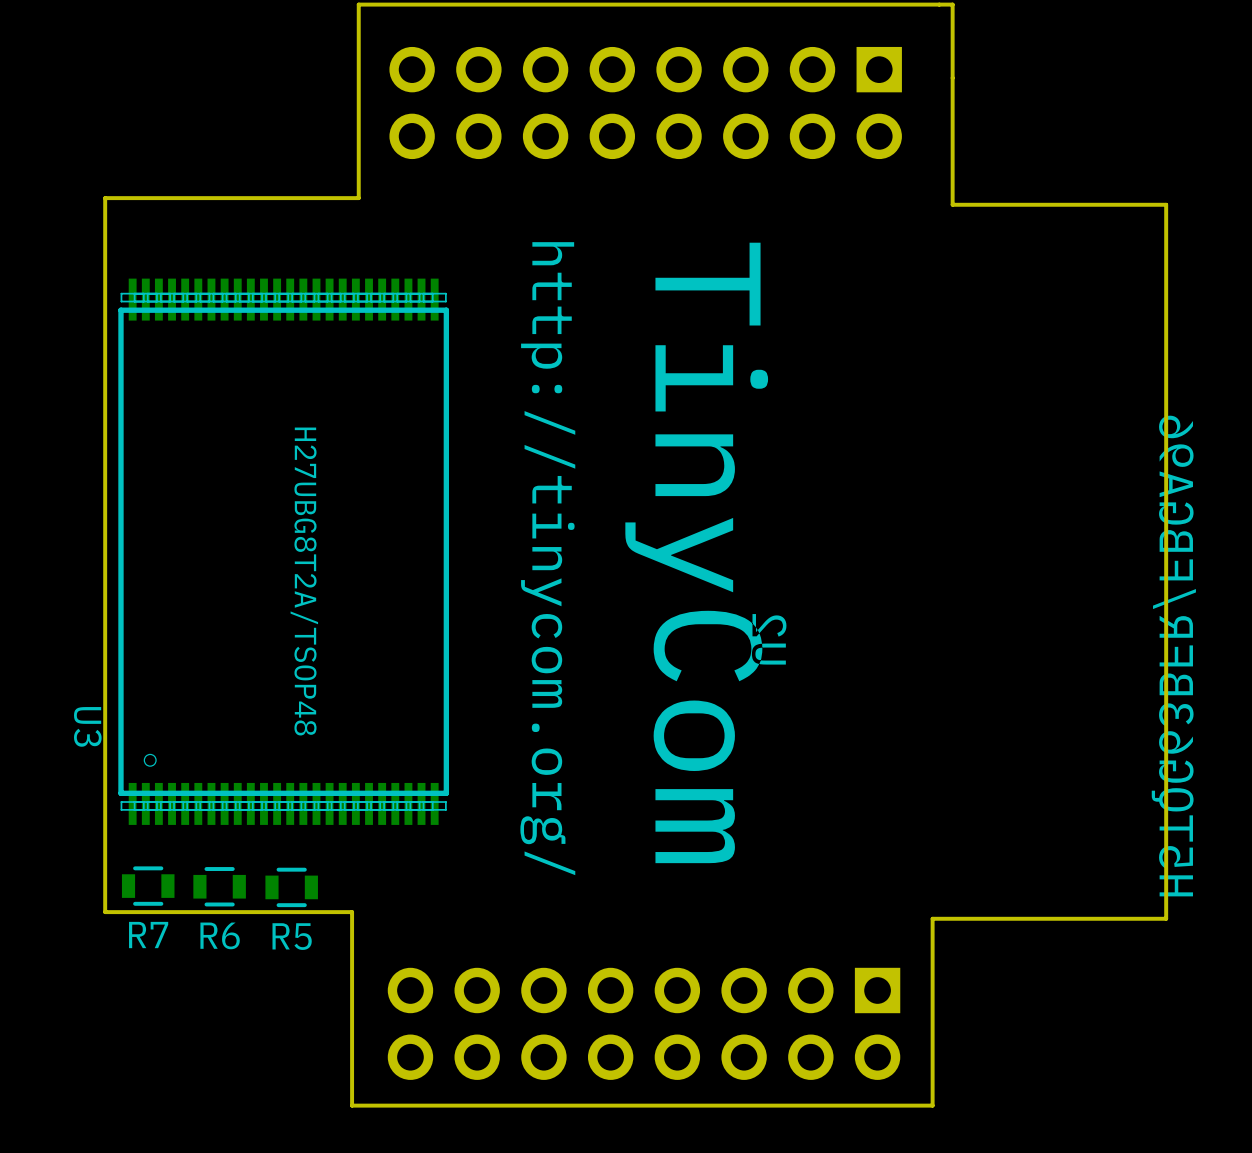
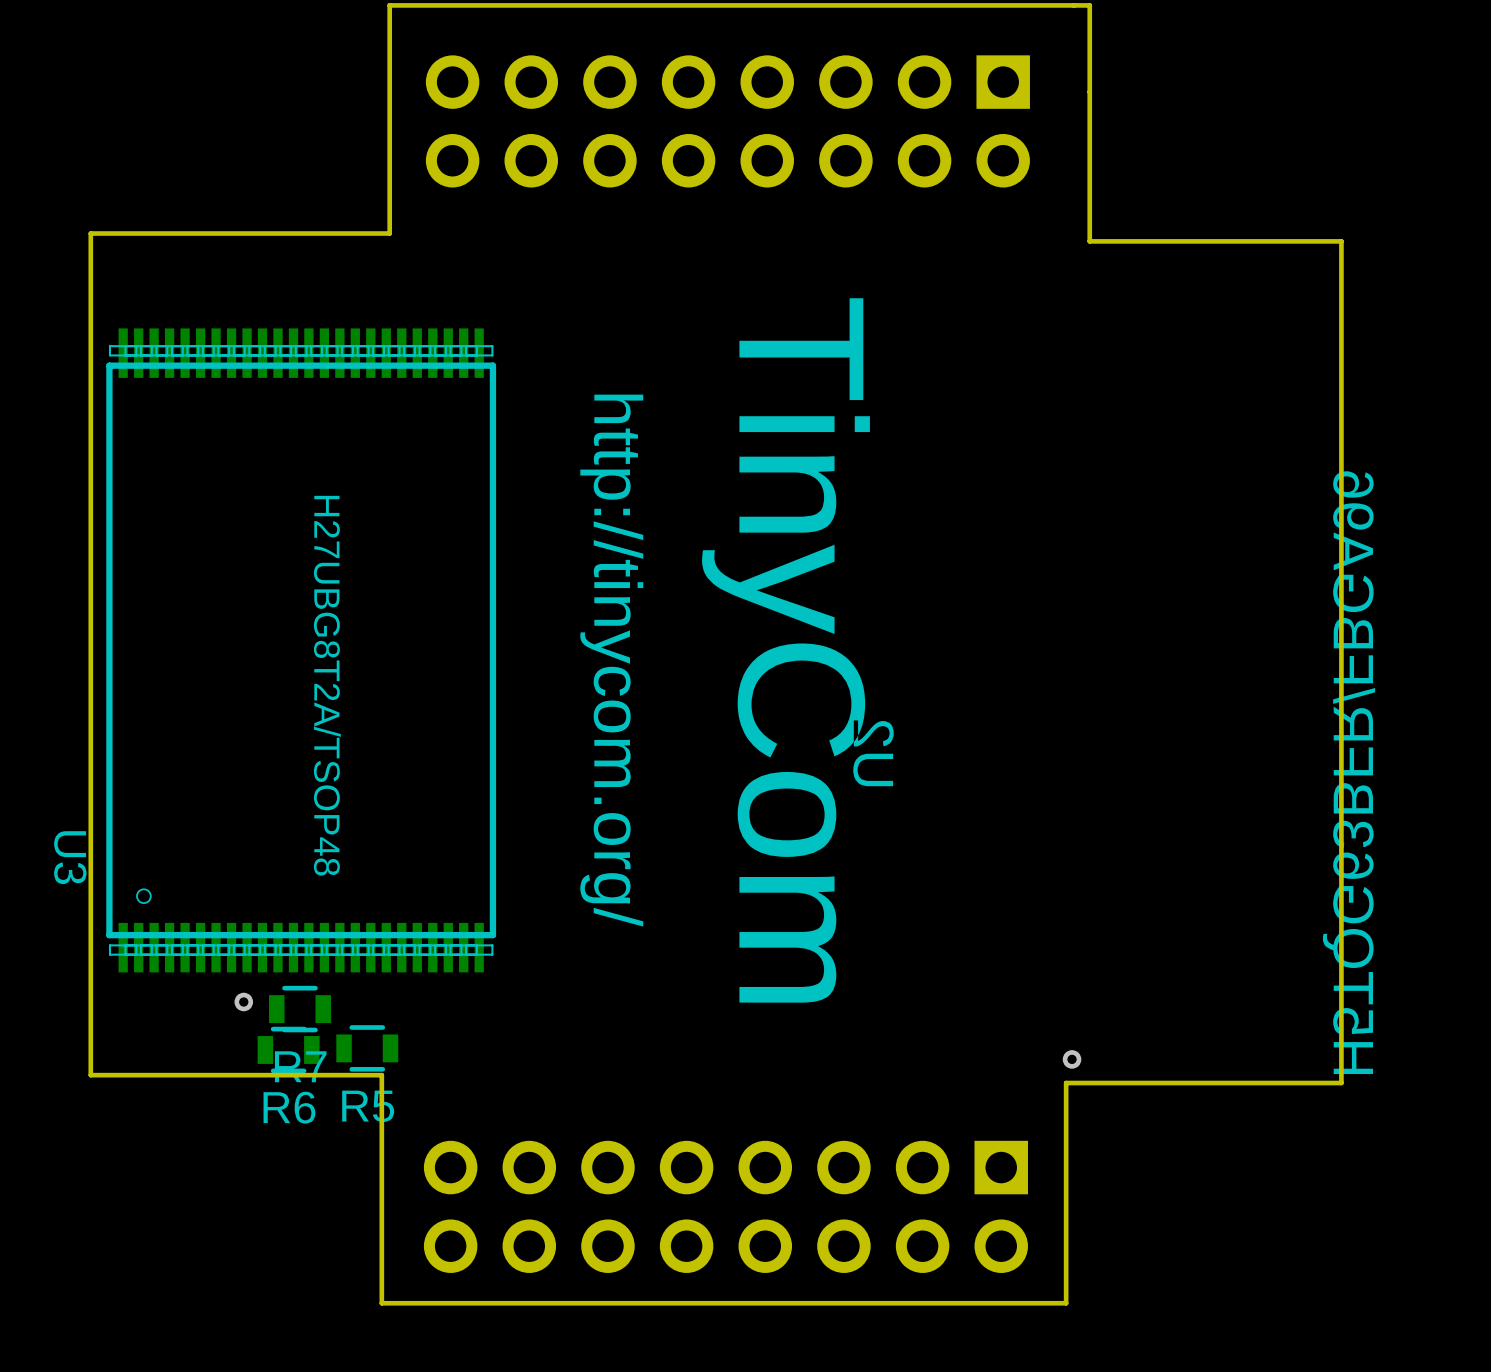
via: none -> (243, 1002)
R7 position: (148, 886) -> (299, 1009)
R6 position: (219, 886) -> (288, 1049)
R5 position: (291, 887) -> (367, 1048)
via: none -> (1072, 1059)

